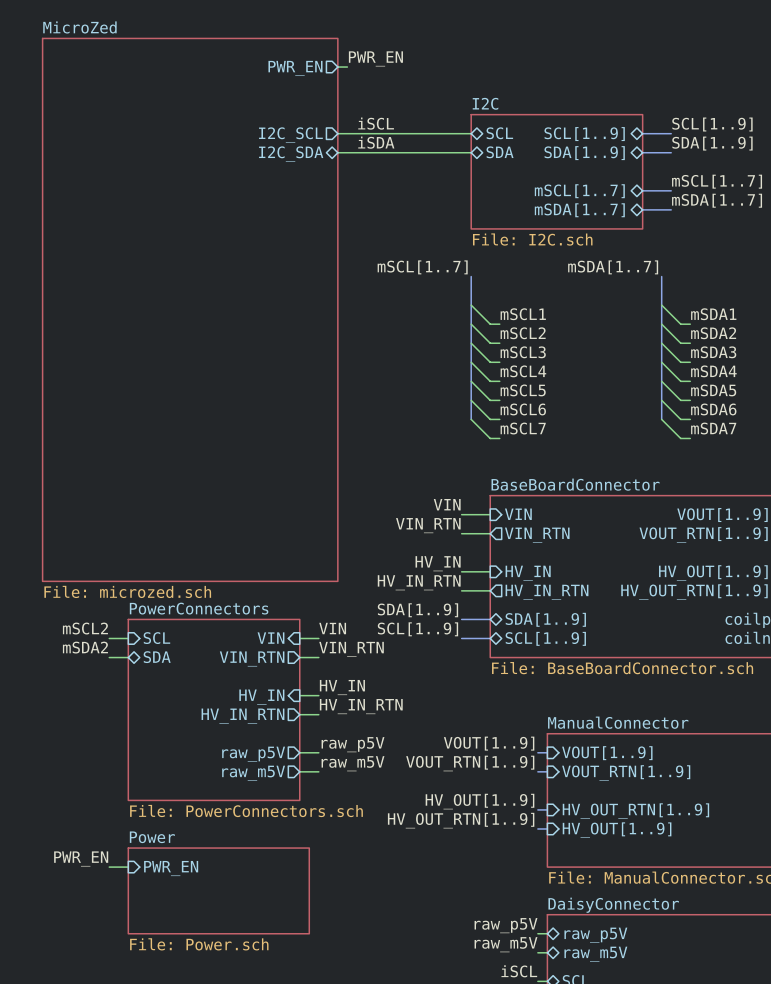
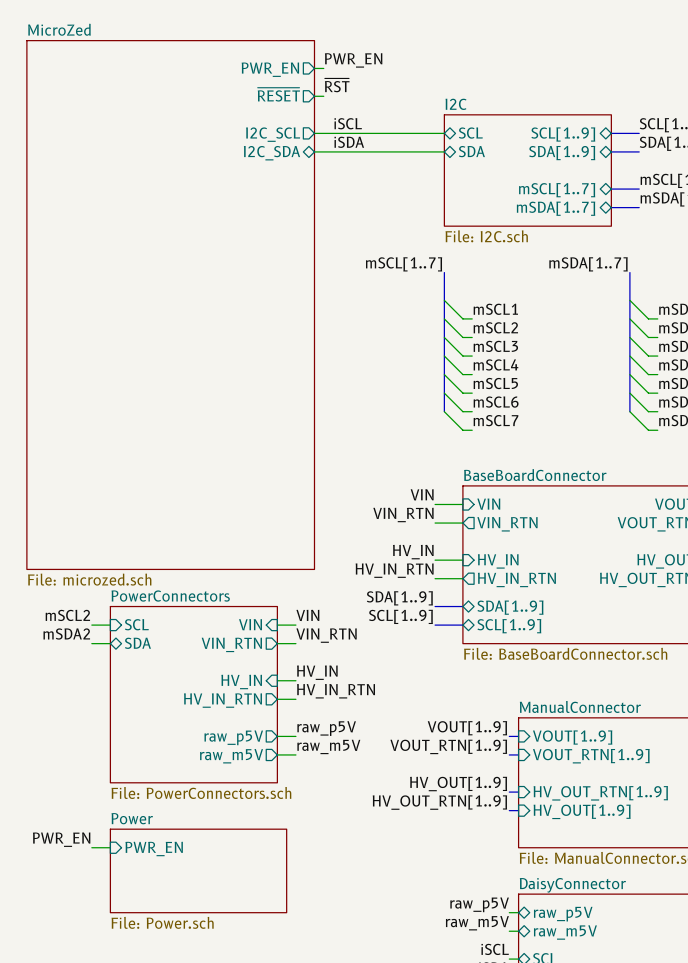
label: none -> ~{RST} (337, 85)
sheet pin: none -> ~{RESET} (278, 94)
wire: none -> (314, 96) (323, 96)

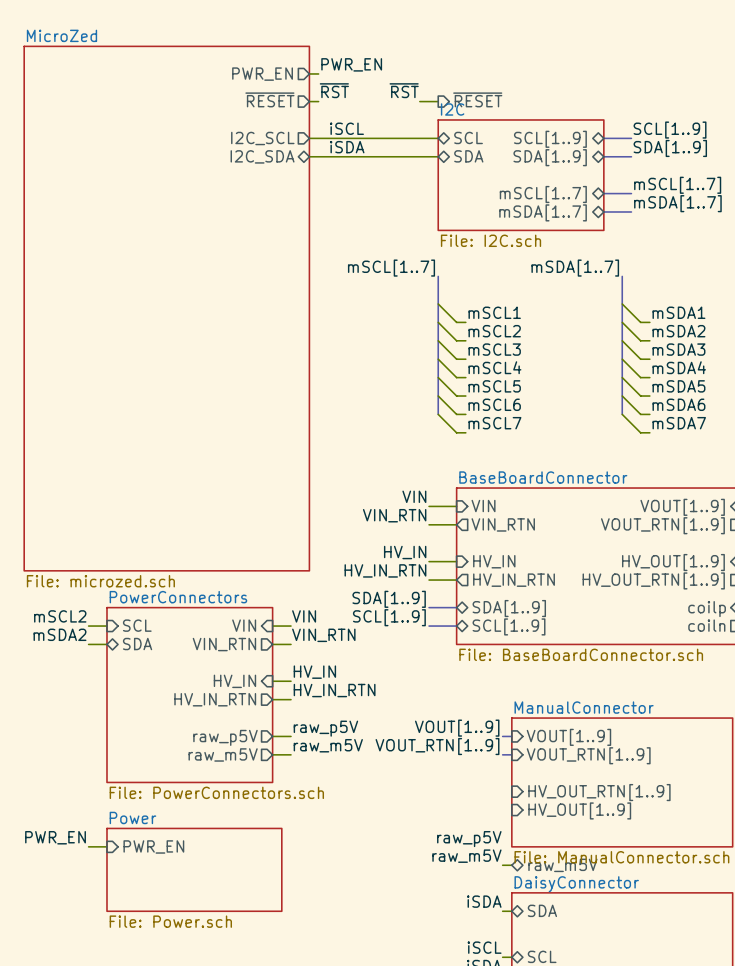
label: none -> ~{RST} (404, 90)
sheet pin: none -> ~{RESET} (477, 99)
wire: none -> (419, 101) (438, 101)
label: HV_OUT[1..9] (458, 784) -> none
bus: (509, 792) (518, 792) -> none
label: HV_OUT_RTN[1..9] (439, 802) -> none
bus: (509, 810) (518, 810) -> none
label: none -> raw_p5V (469, 839)
label: raw_p5V (479, 904) -> iSDA (484, 901)
sheet pin: raw_p5V (563, 914) -> SDA (542, 910)
label position: raw_m5V (477, 923) -> raw_m5V (466, 856)
wire: (509, 931) (518, 931) -> (502, 865) (511, 865)
sheet pin position: raw_m5V (565, 932) -> raw_m5V (562, 865)

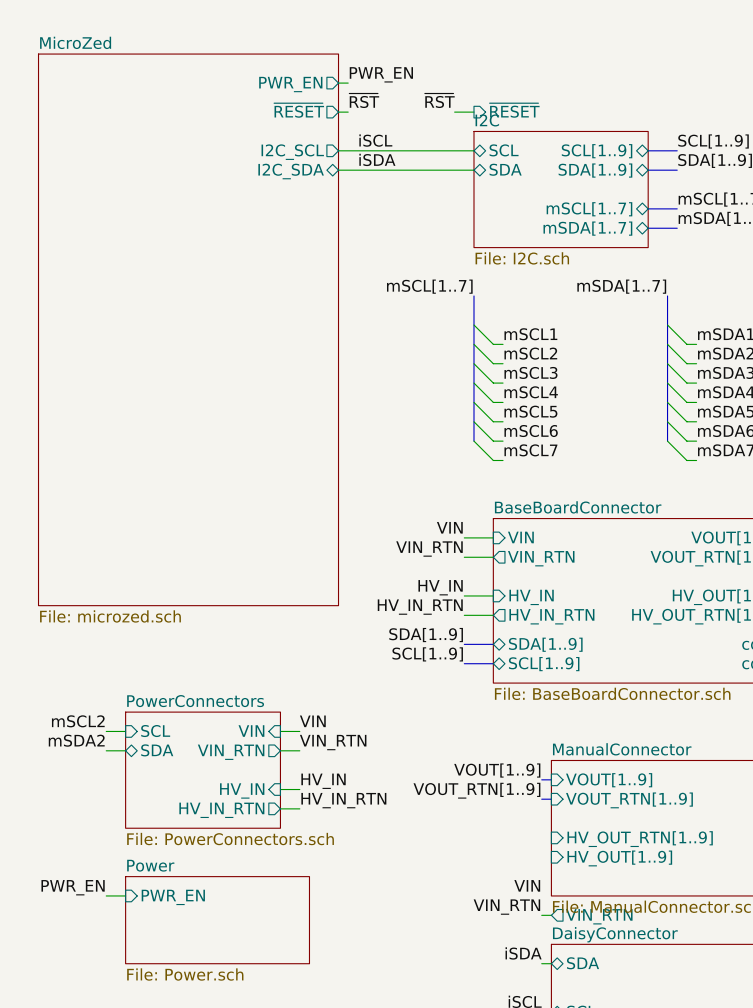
label position: mSCL2 (60, 616) -> mSCL2 (78, 721)
label position: VIN (304, 616) -> VIN (312, 721)
sheet pin position: SCL (137, 625) -> SCL (155, 731)
sheet pin position: VIN (244, 625) -> VIN (251, 731)
wire: (88, 626) (106, 626) -> (106, 731) (125, 731)
wire: (272, 626) (291, 626) -> none
label position: mSDA2 (60, 634) -> mSDA2 (76, 740)
label position: VIN_RTN (323, 635) -> VIN_RTN (333, 742)
wire: (88, 644) (106, 644) -> (106, 750) (125, 750)
sheet pin position: SDA (137, 644) -> SDA (157, 750)
sheet pin position: VIN_RTN (224, 644) -> VIN_RTN (231, 752)
wire: (272, 644) (291, 644) -> none
label position: HV_IN (314, 672) -> HV_IN (323, 781)
sheet pin position: HV_IN (234, 681) -> HV_IN (242, 790)
wire: (272, 681) (291, 681) -> (280, 731) (299, 731)
label position: HV_IN_RTN (334, 690) -> HV_IN_RTN (343, 800)
sheet PowerConnectors: File: PowerConnectors.sch (189, 695) -> none
sheet pin position: HV_IN_RTN (215, 699) -> HV_IN_RTN (221, 810)
wire: (272, 699) (291, 699) -> (280, 750) (299, 750)
sheet PowerConnectors: none -> File: PowerConnectors.sch (203, 770)
label: raw_p5V (325, 728) -> none
wire: (272, 736) (291, 736) -> (280, 789) (299, 789)
sheet pin: raw_p5V (225, 737) -> none
label: raw_m5V (328, 745) -> none
sheet pin: raw_m5V (223, 754) -> none
wire: (272, 754) (291, 754) -> (280, 808) (299, 808)
label: raw_p5V (469, 839) -> VIN (527, 885)
label: raw_m5V (466, 856) -> VIN_RTN (506, 907)
sheet pin shape: bidirectional (562, 865) -> output (599, 916)
sheet pin: raw_m5V (562, 865) -> VIN_RTN (599, 916)

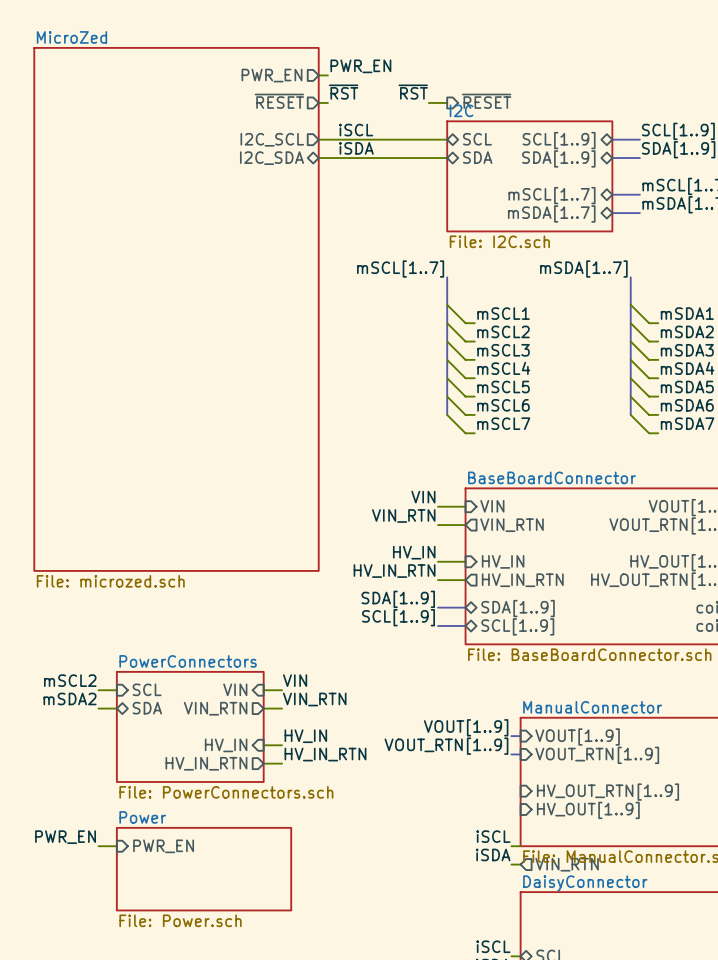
label: VIN (527, 885) -> iSCL (493, 836)
label: VIN_RTN (506, 907) -> iSDA (493, 854)
label: iSDA (523, 953) -> none
wire: (541, 963) (551, 963) -> (511, 846) (520, 846)
sheet pin: SDA (583, 963) -> none

